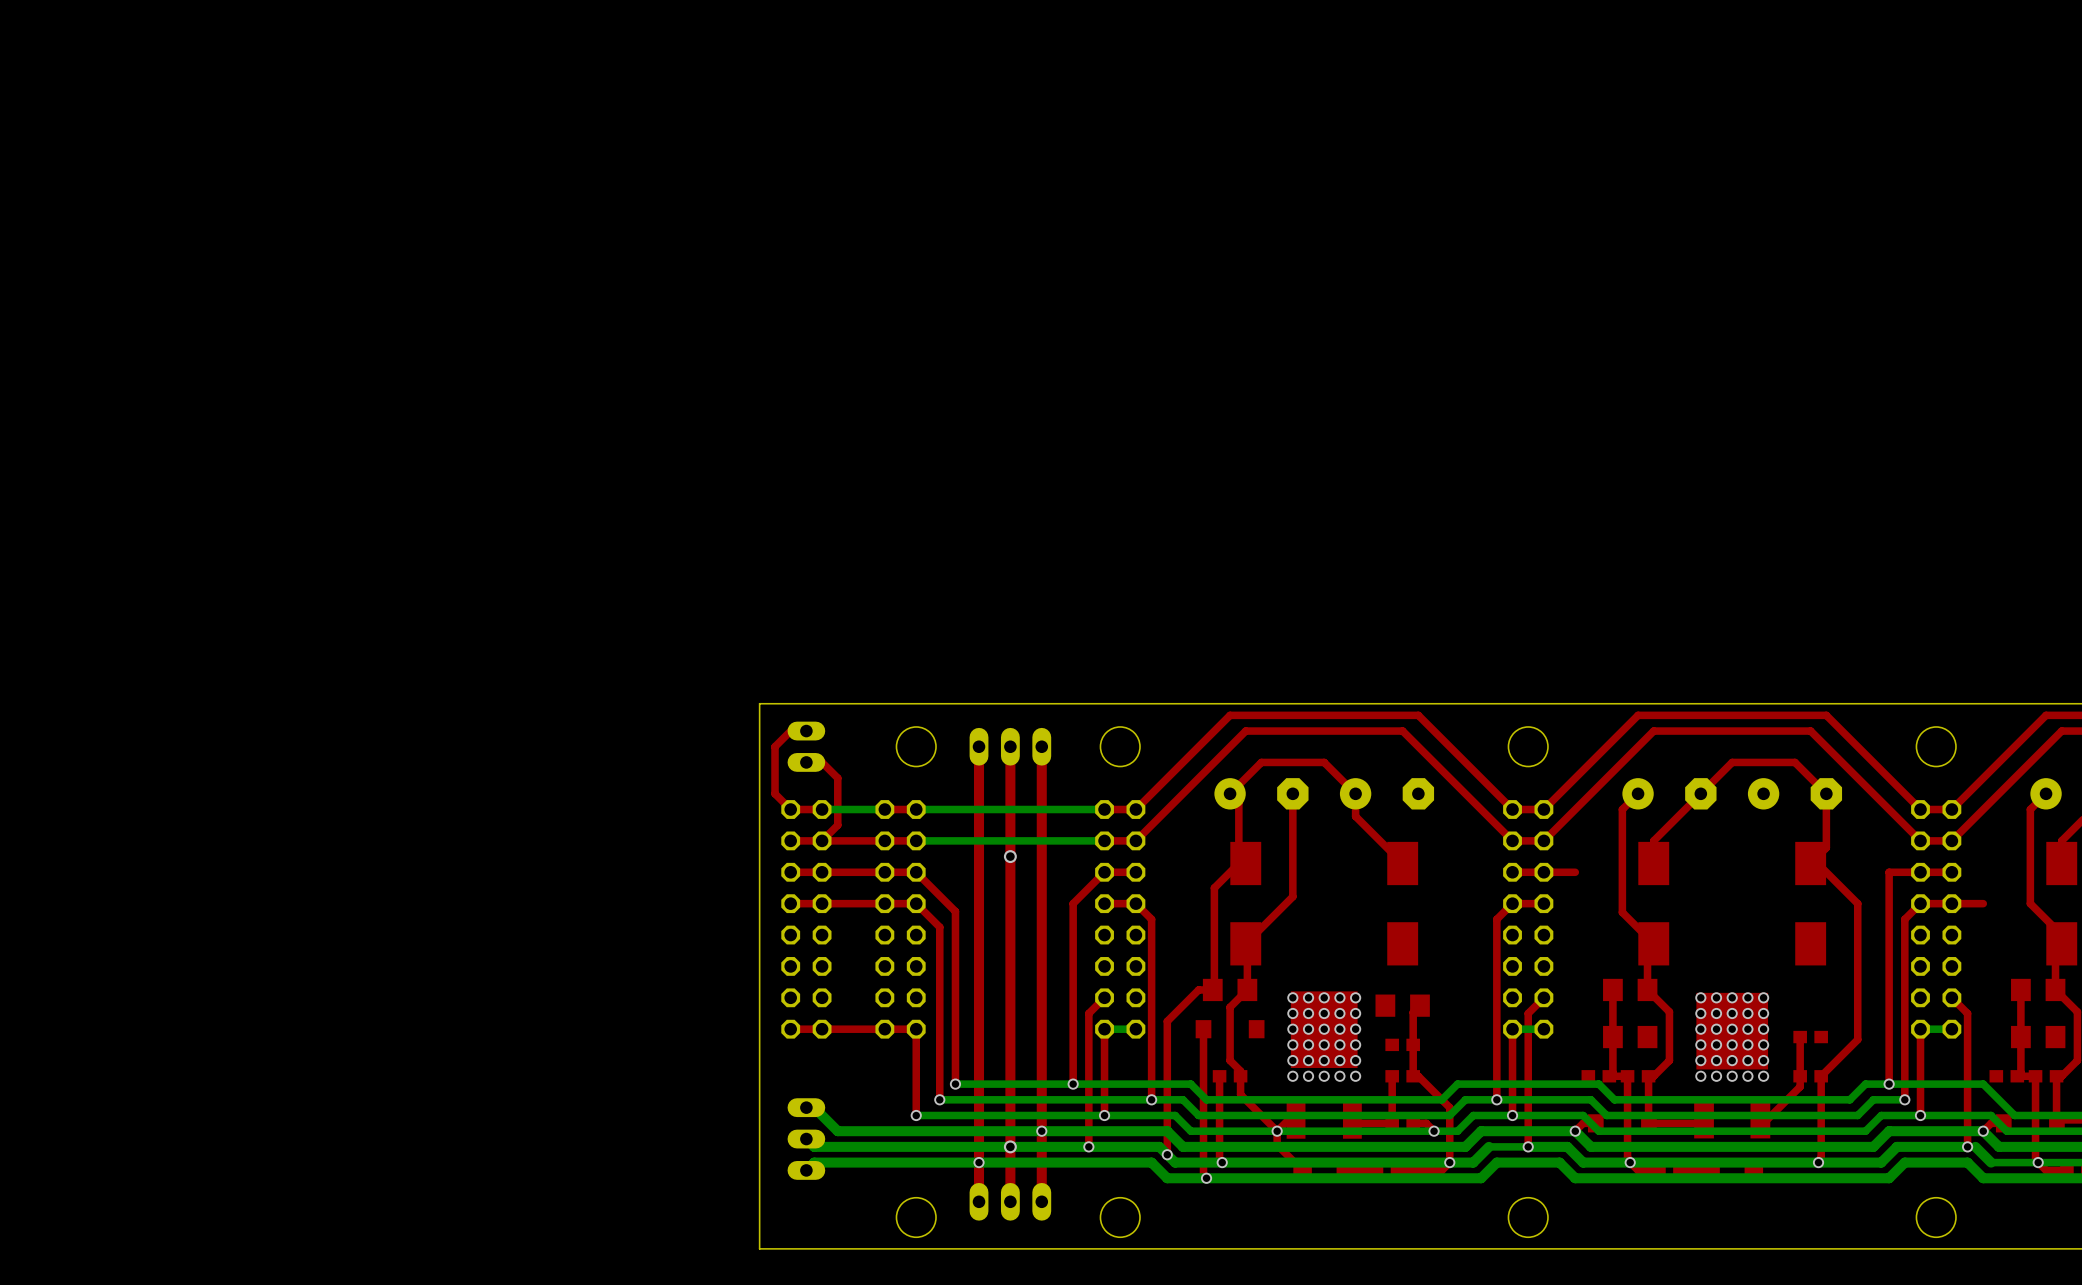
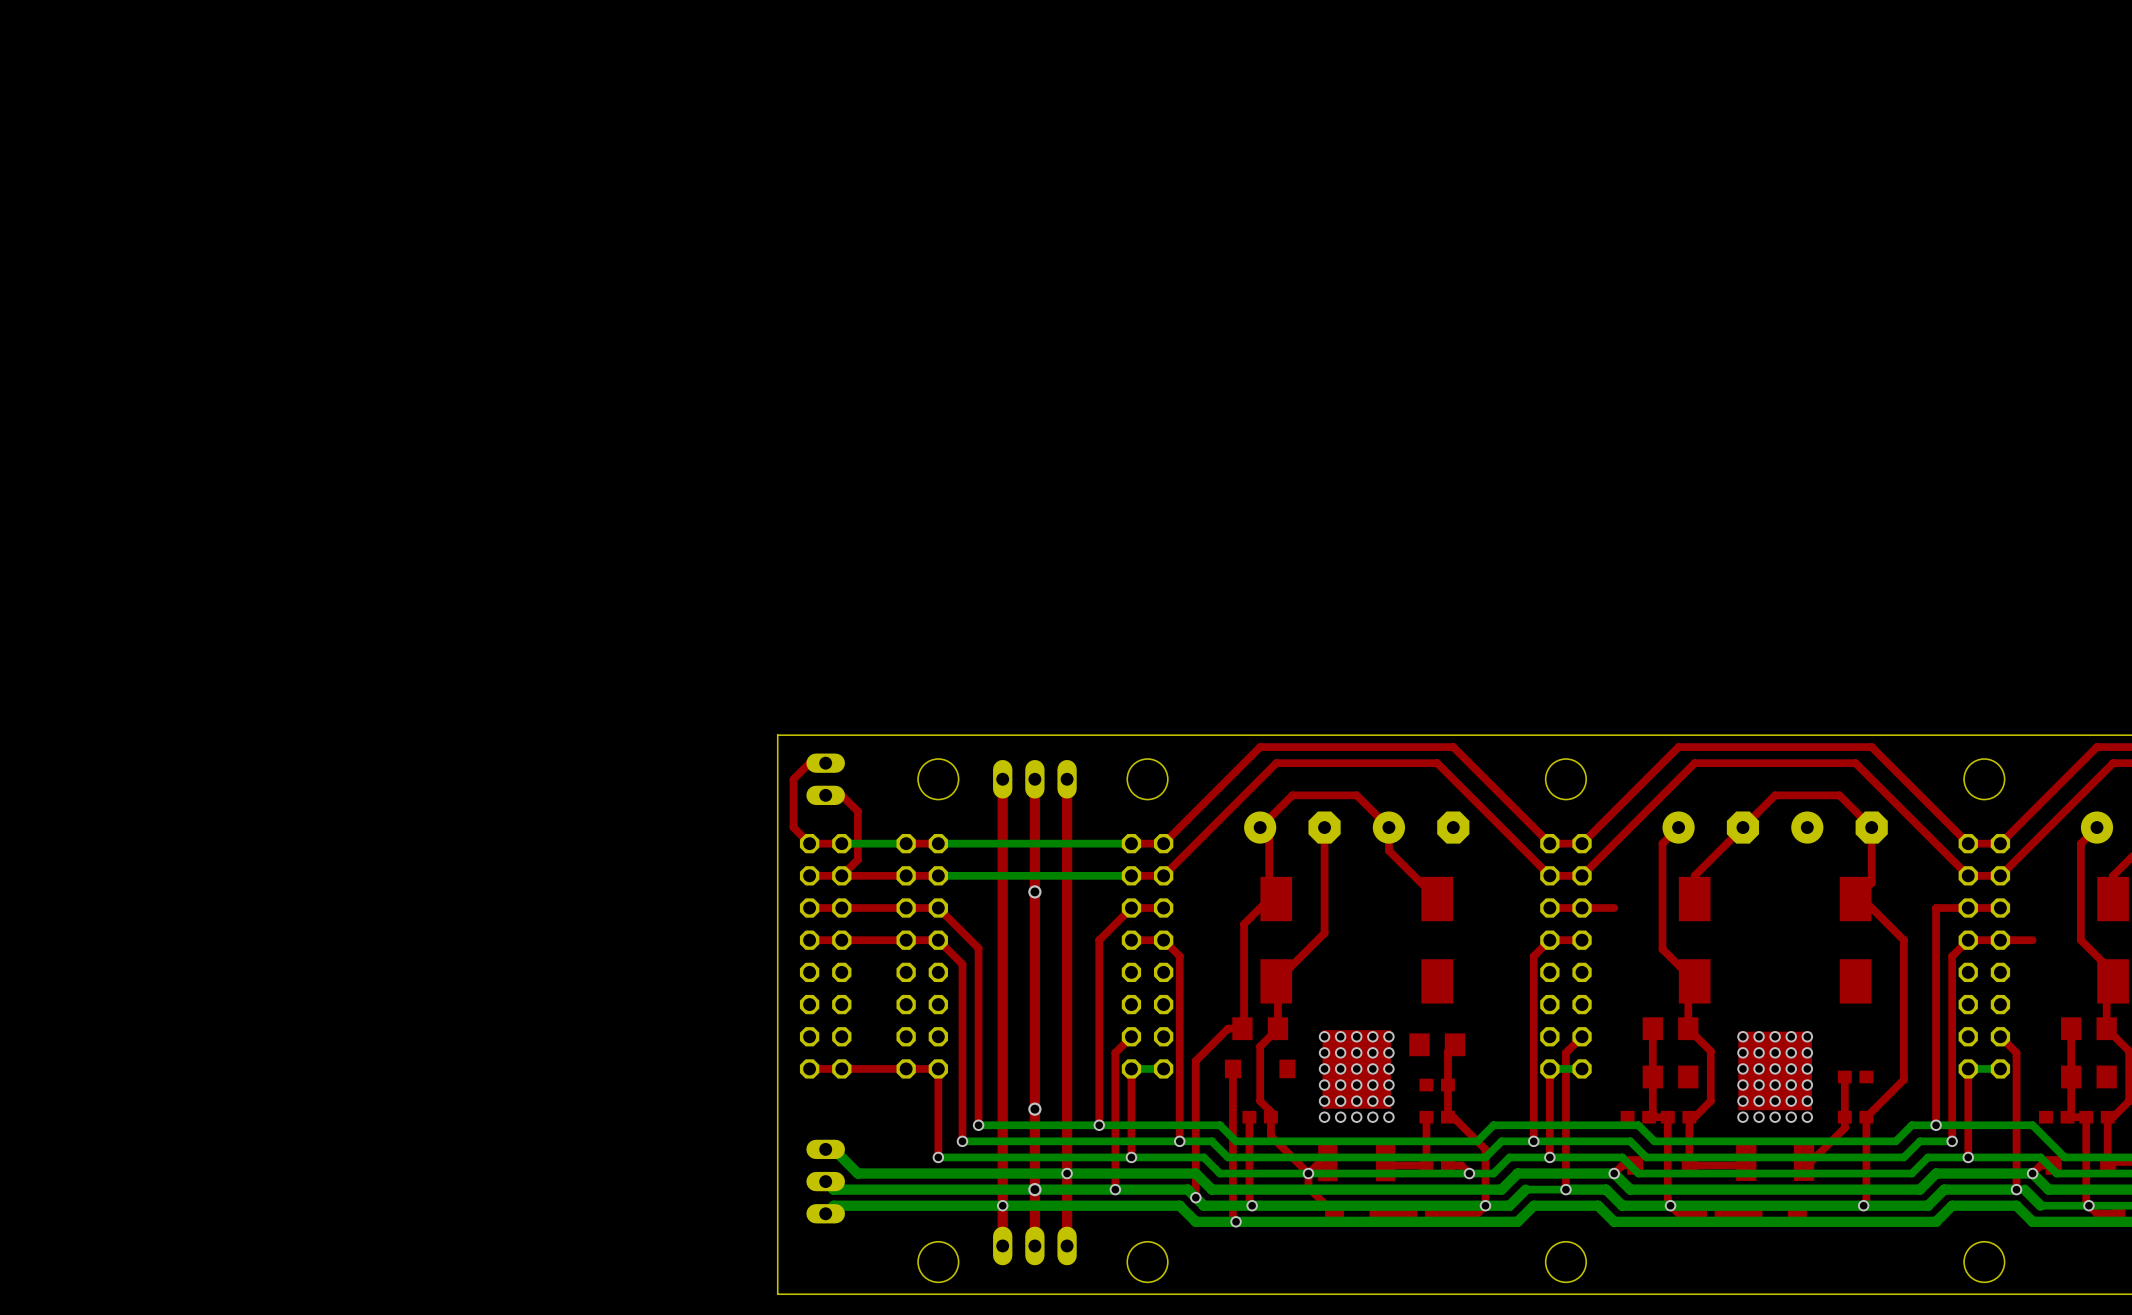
via: none -> (1034, 1109)

